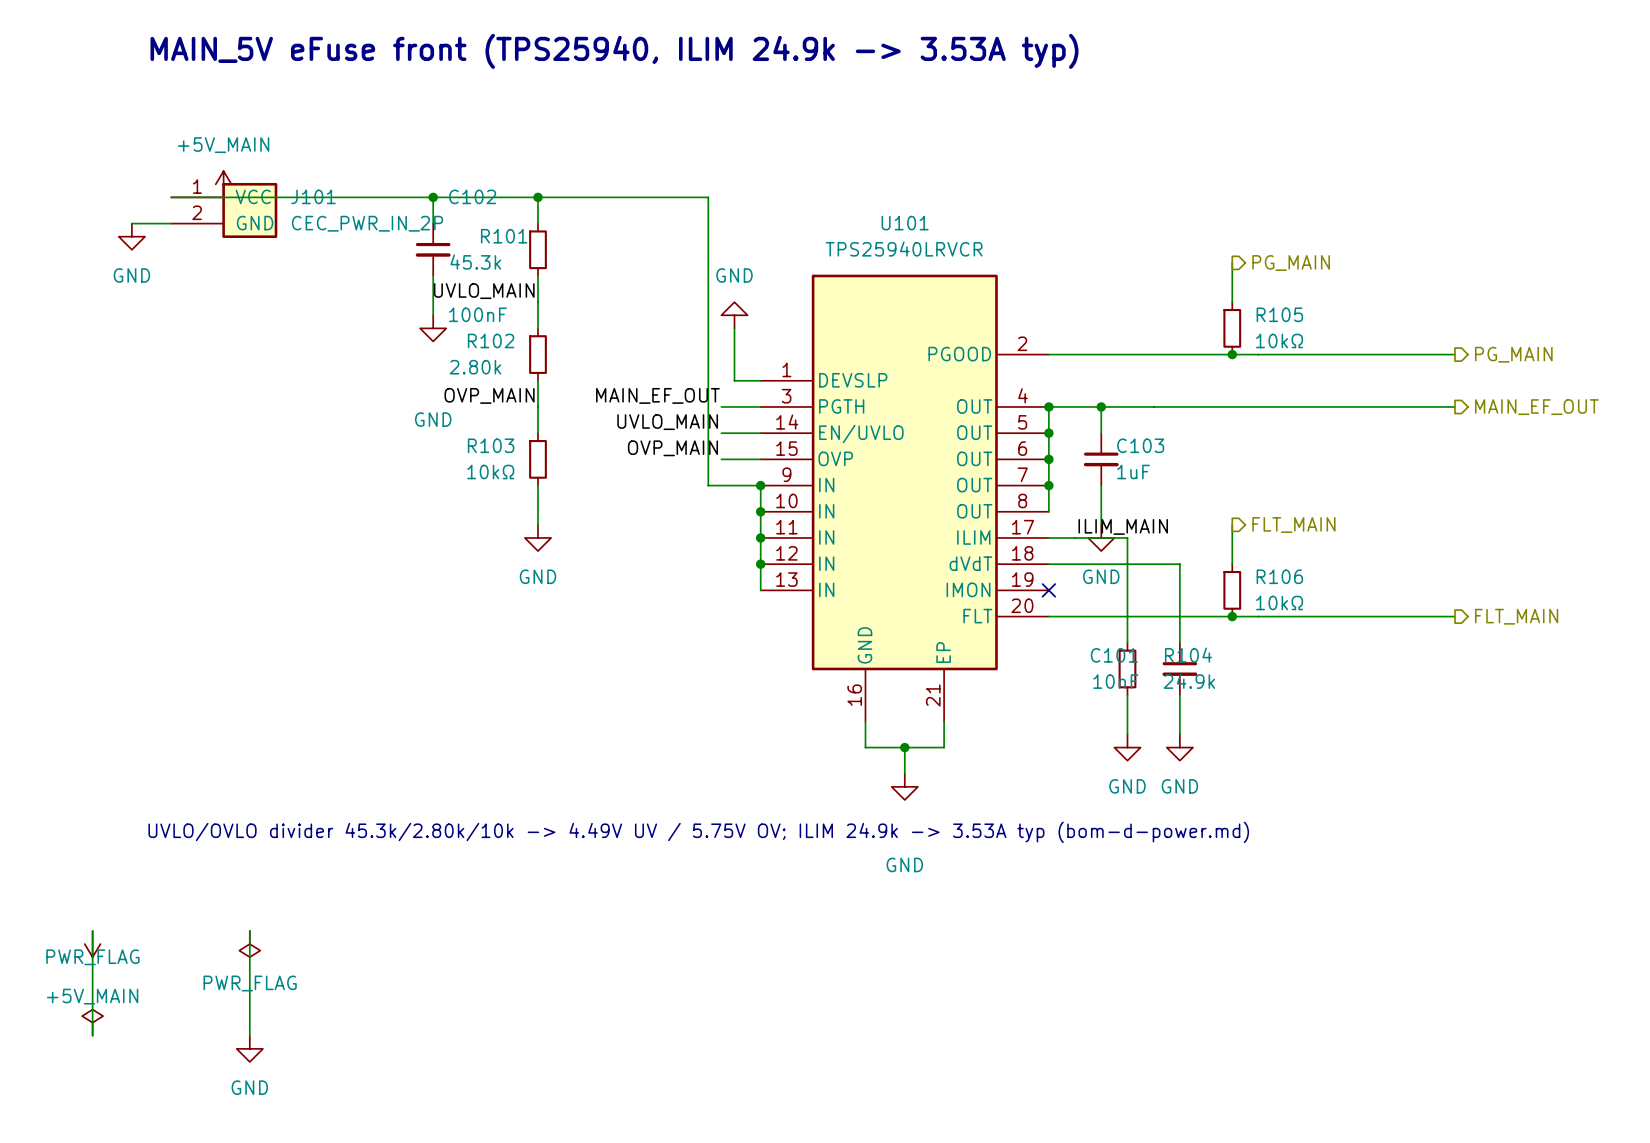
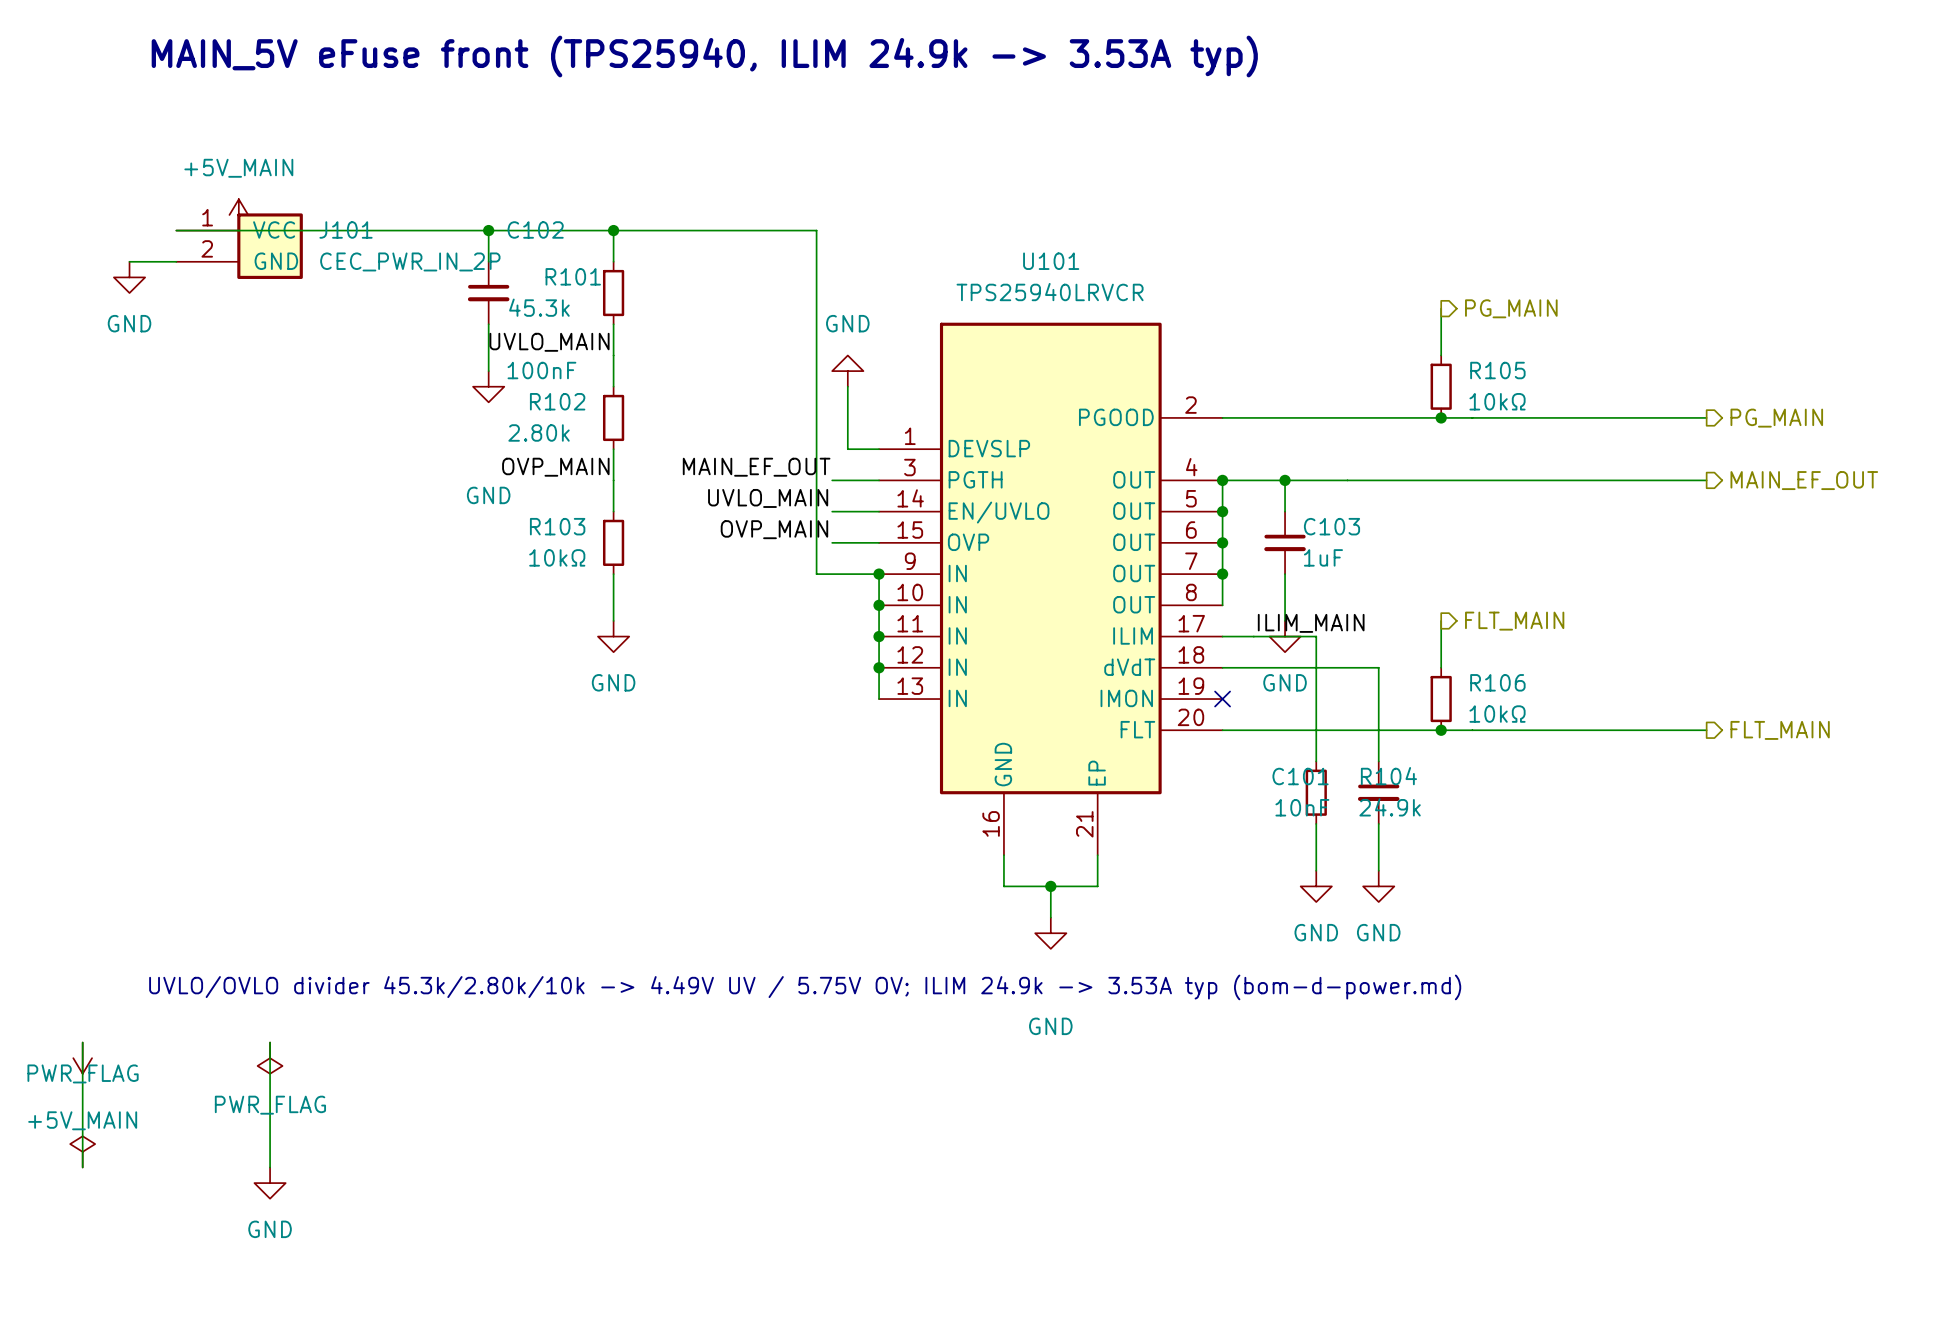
power symbol position: +5V_MAIN (92, 944) -> +5V_MAIN (82, 1058)
power symbol position: PWR_FLAG (249, 944) -> PWR_FLAG (270, 1058)
wire: (92, 983) (92, 1035) -> (82, 1042) (82, 1105)
wire: (249, 983) (249, 1035) -> (270, 1042) (270, 1105)
power symbol position: PWR_FLAG (92, 1022) -> PWR_FLAG (82, 1151)
power symbol position: GND (249, 1048) -> GND (270, 1183)

